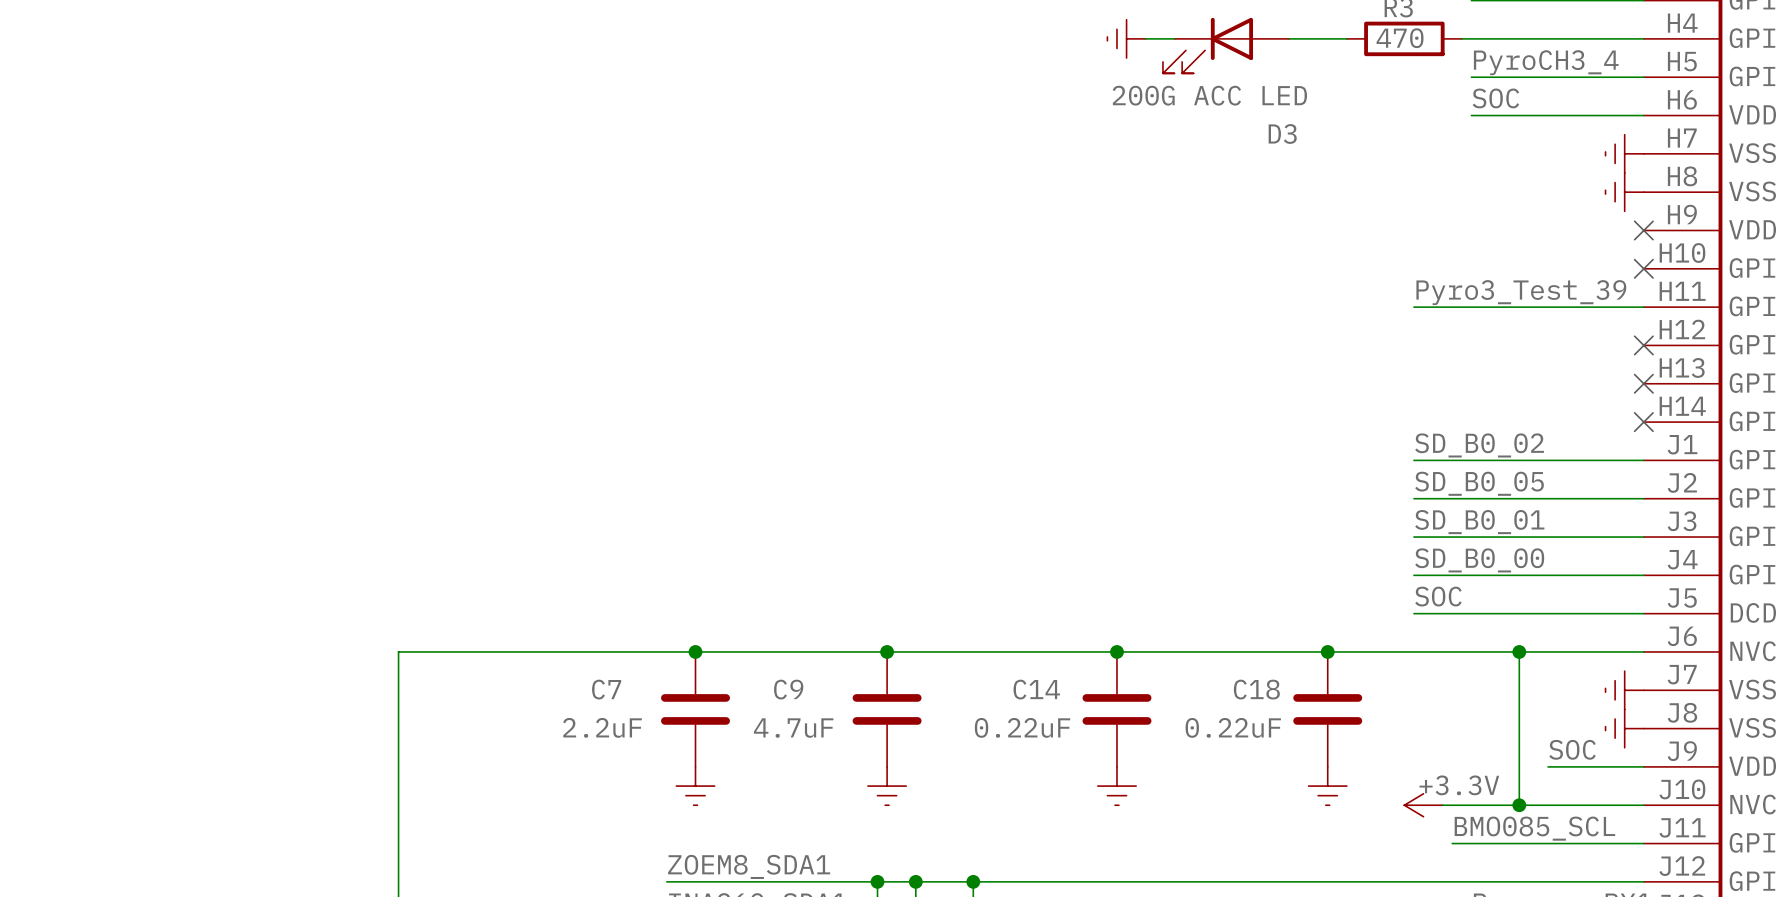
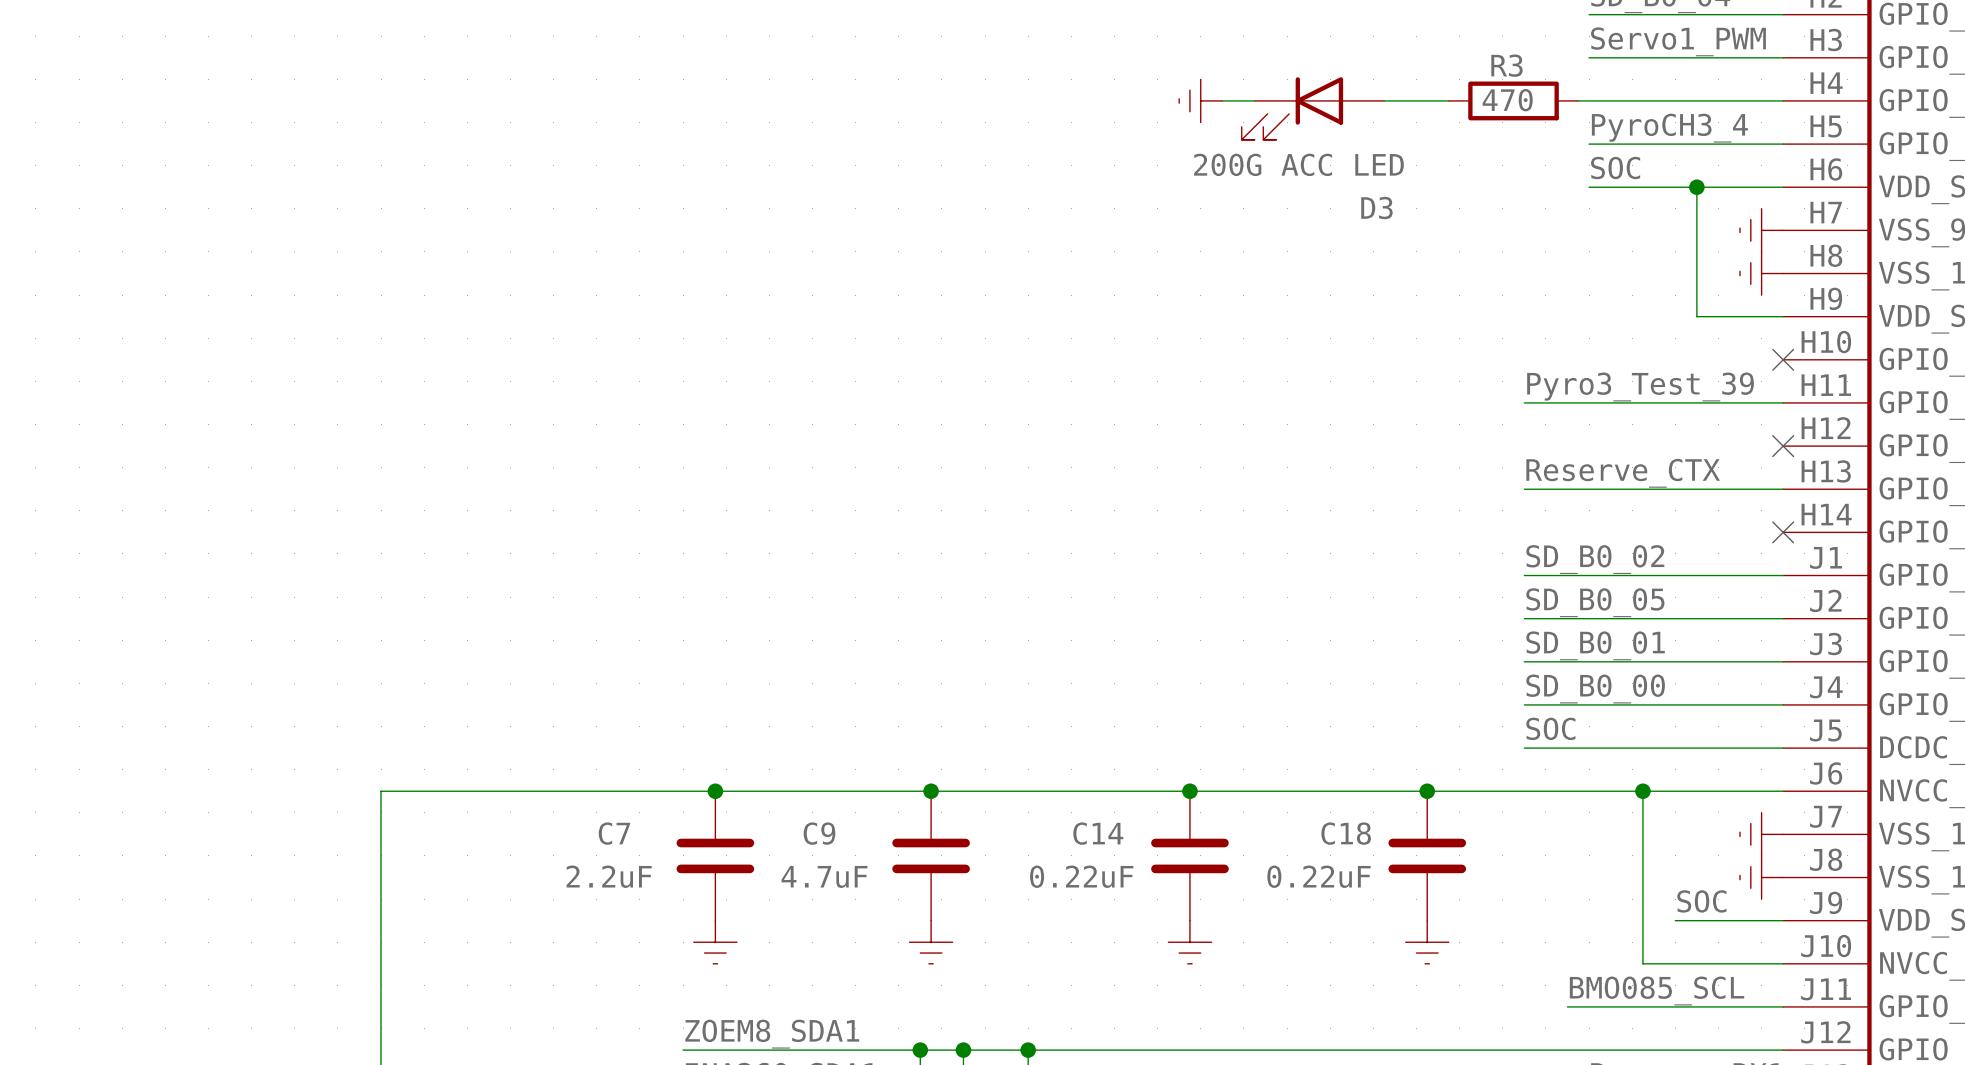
wire: none -> (1696, 187) (1696, 316) (1783, 316)
junction: none -> (1696, 187)
no-connect mark: (1643, 230) -> none
label: none -> Reserve_CTX (1623, 473)
wire: none -> (1524, 489) (1783, 489)
no-connect mark: (1643, 383) -> none
power symbol: +3.3V (1423, 805) -> none
wire: (1442, 805) (1519, 805) -> none
junction: (1519, 805) -> none

